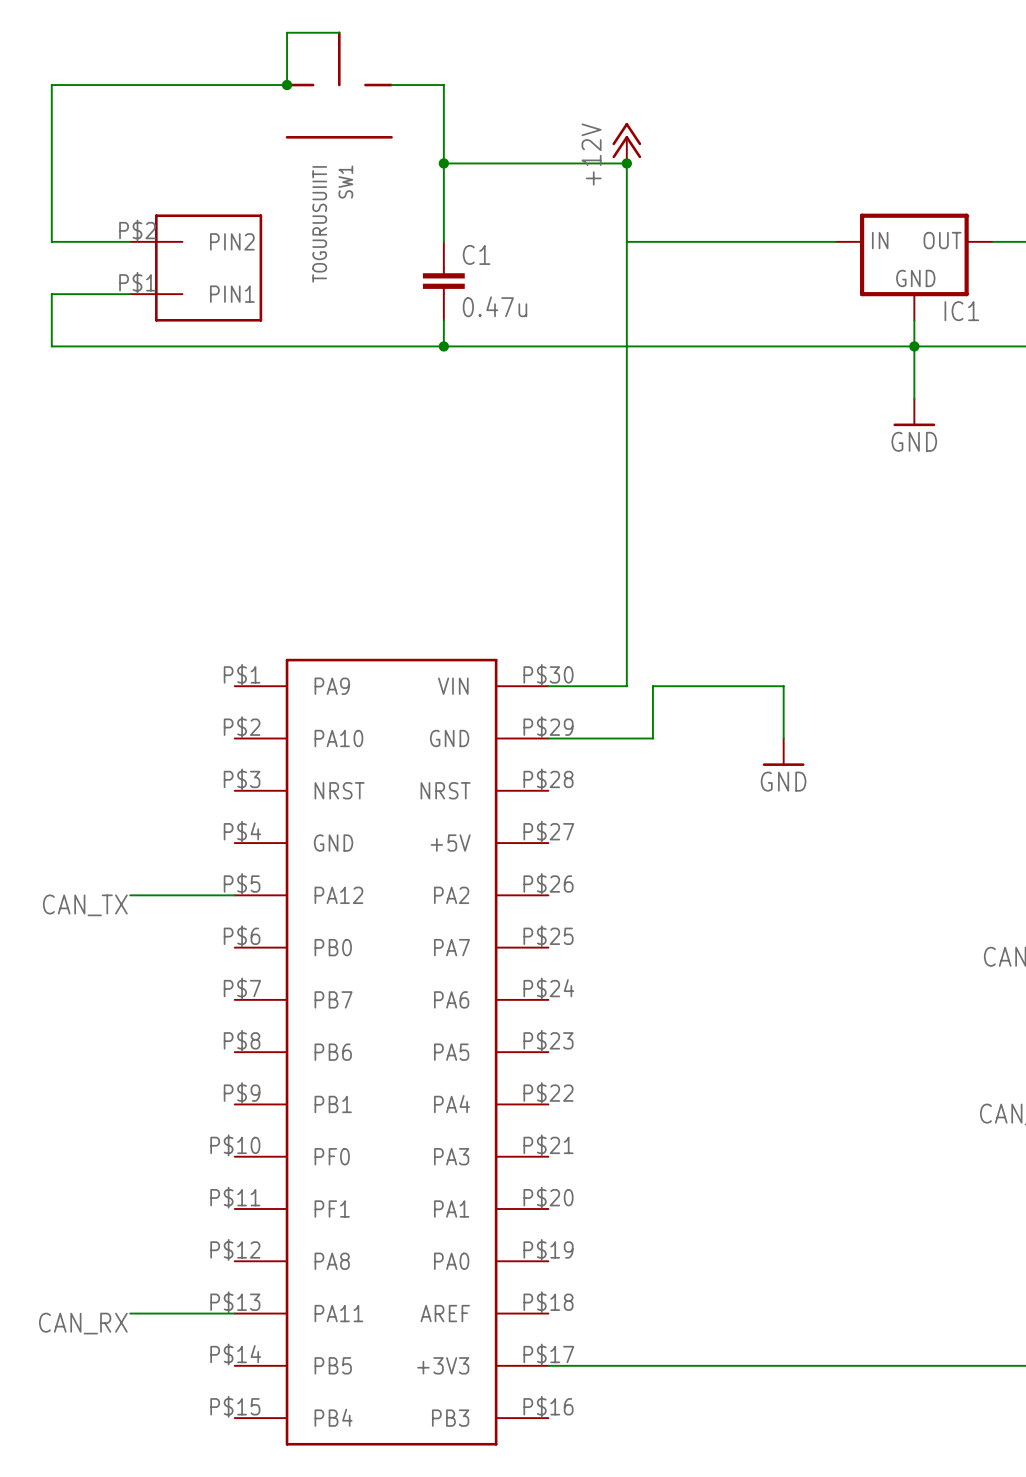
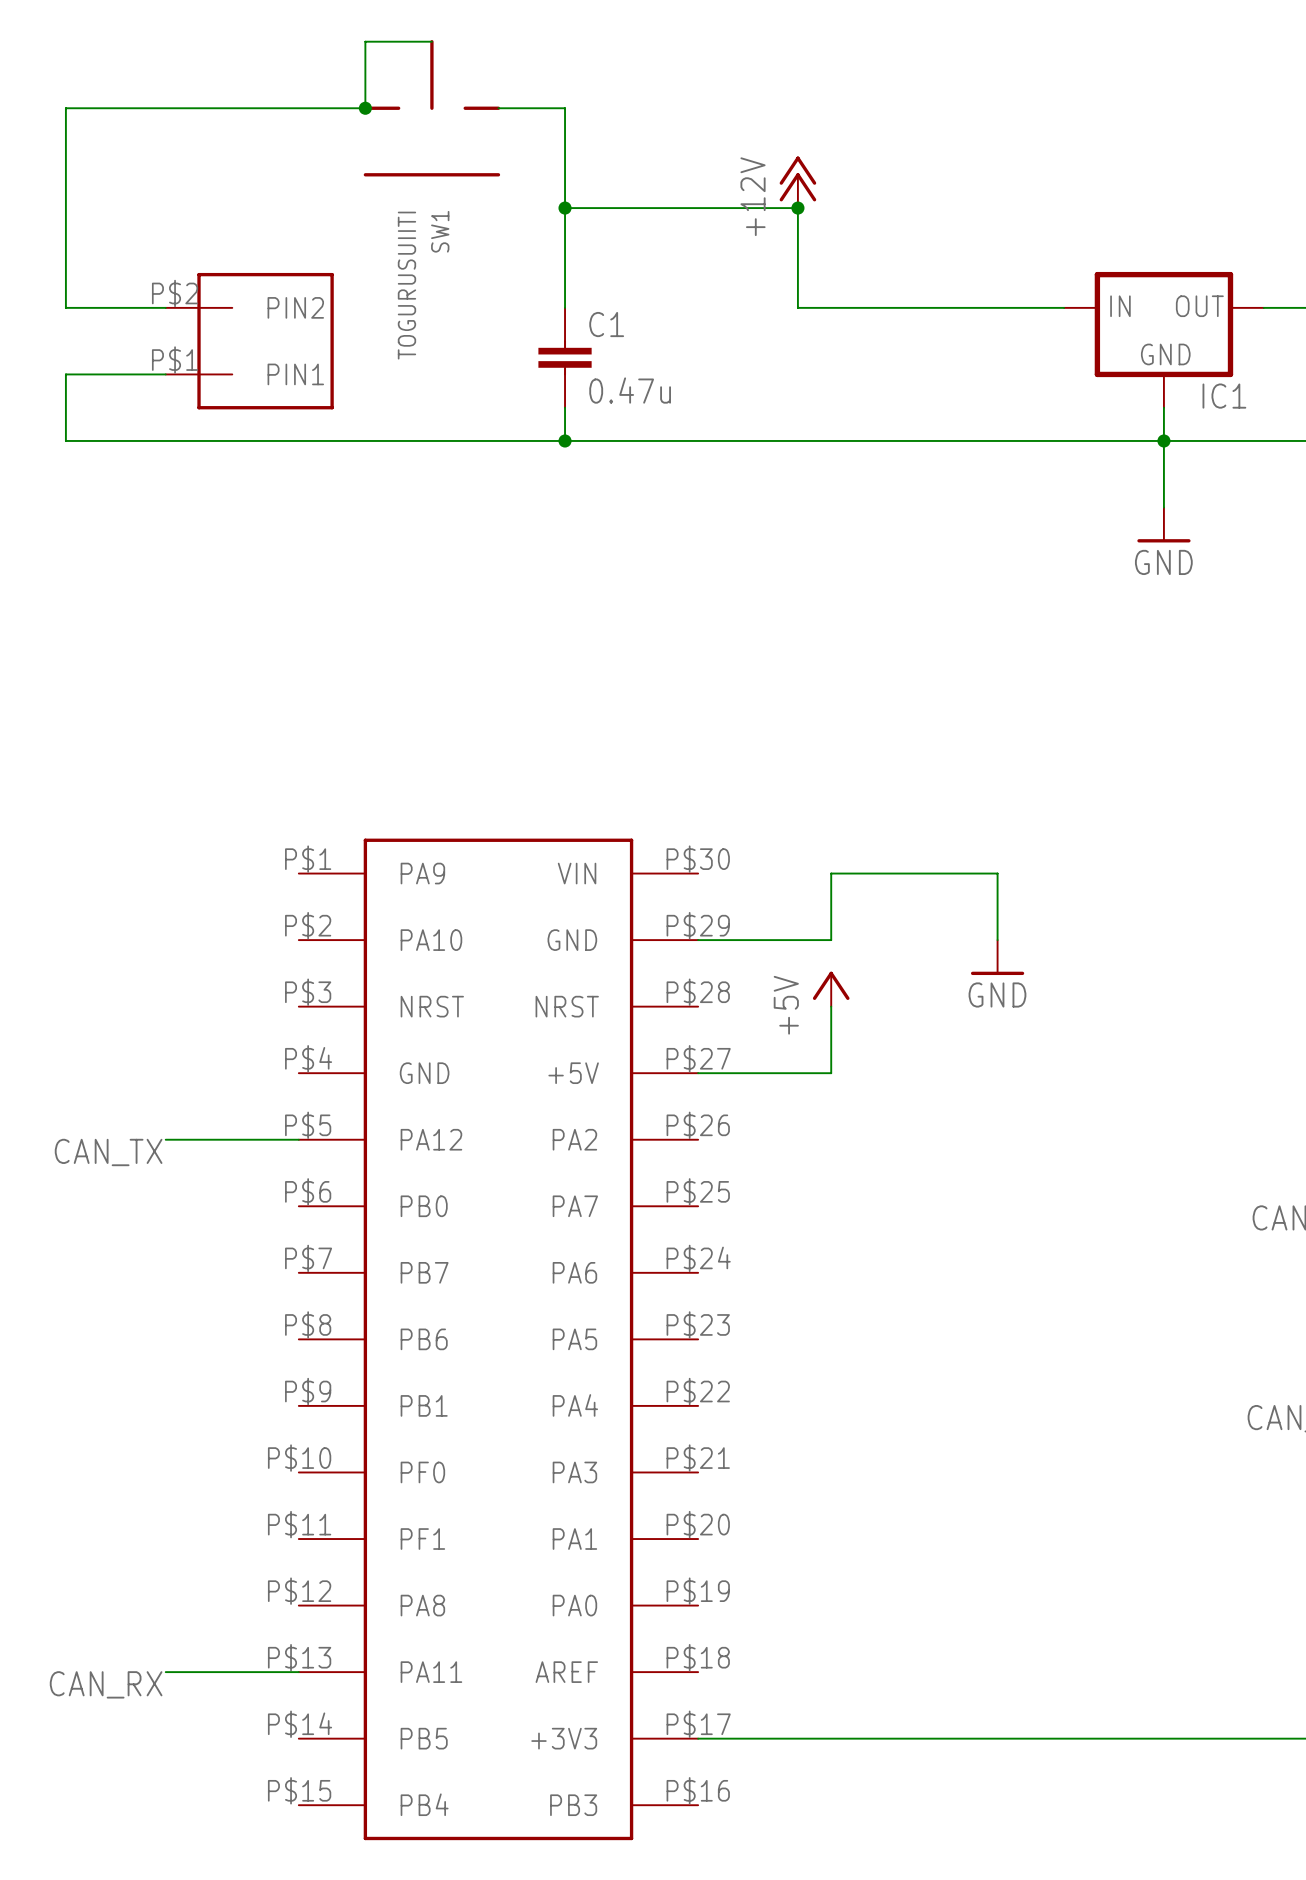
wire: (626, 241) (626, 686) (548, 686) -> none
power symbol: none -> +5V (831, 989)
wire: none -> (831, 1006) (831, 1073) (698, 1073)

